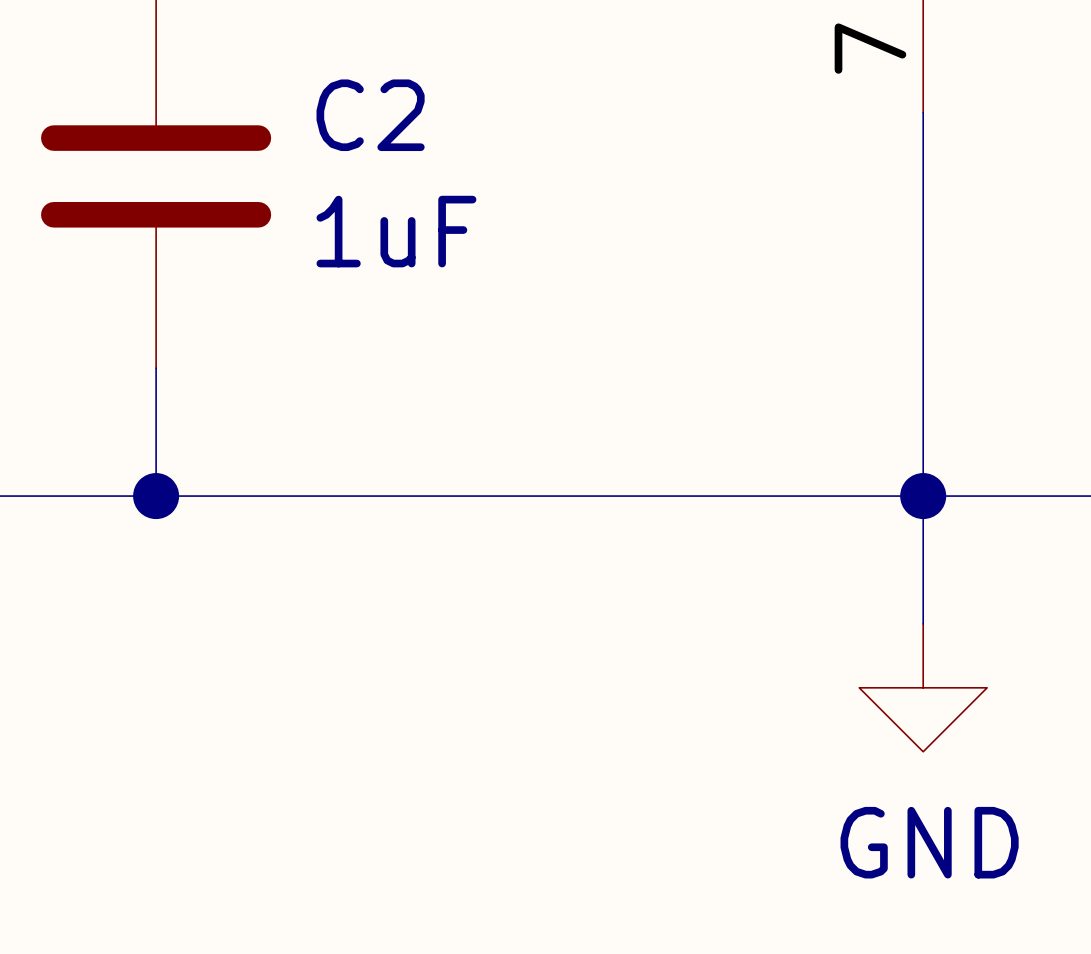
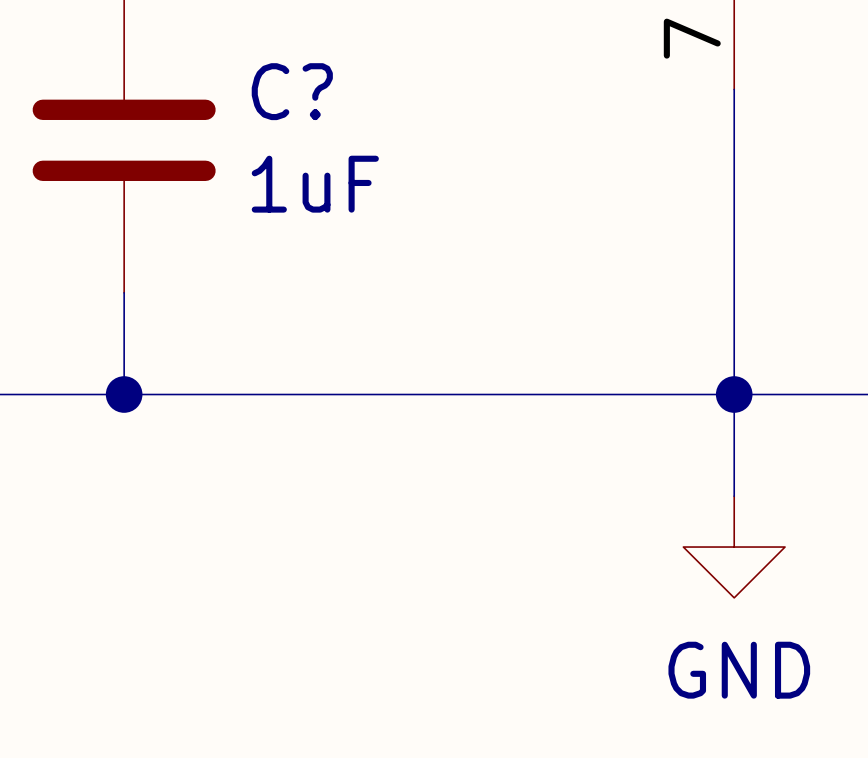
C2 name: C2 (370, 115) -> C? (292, 91)

